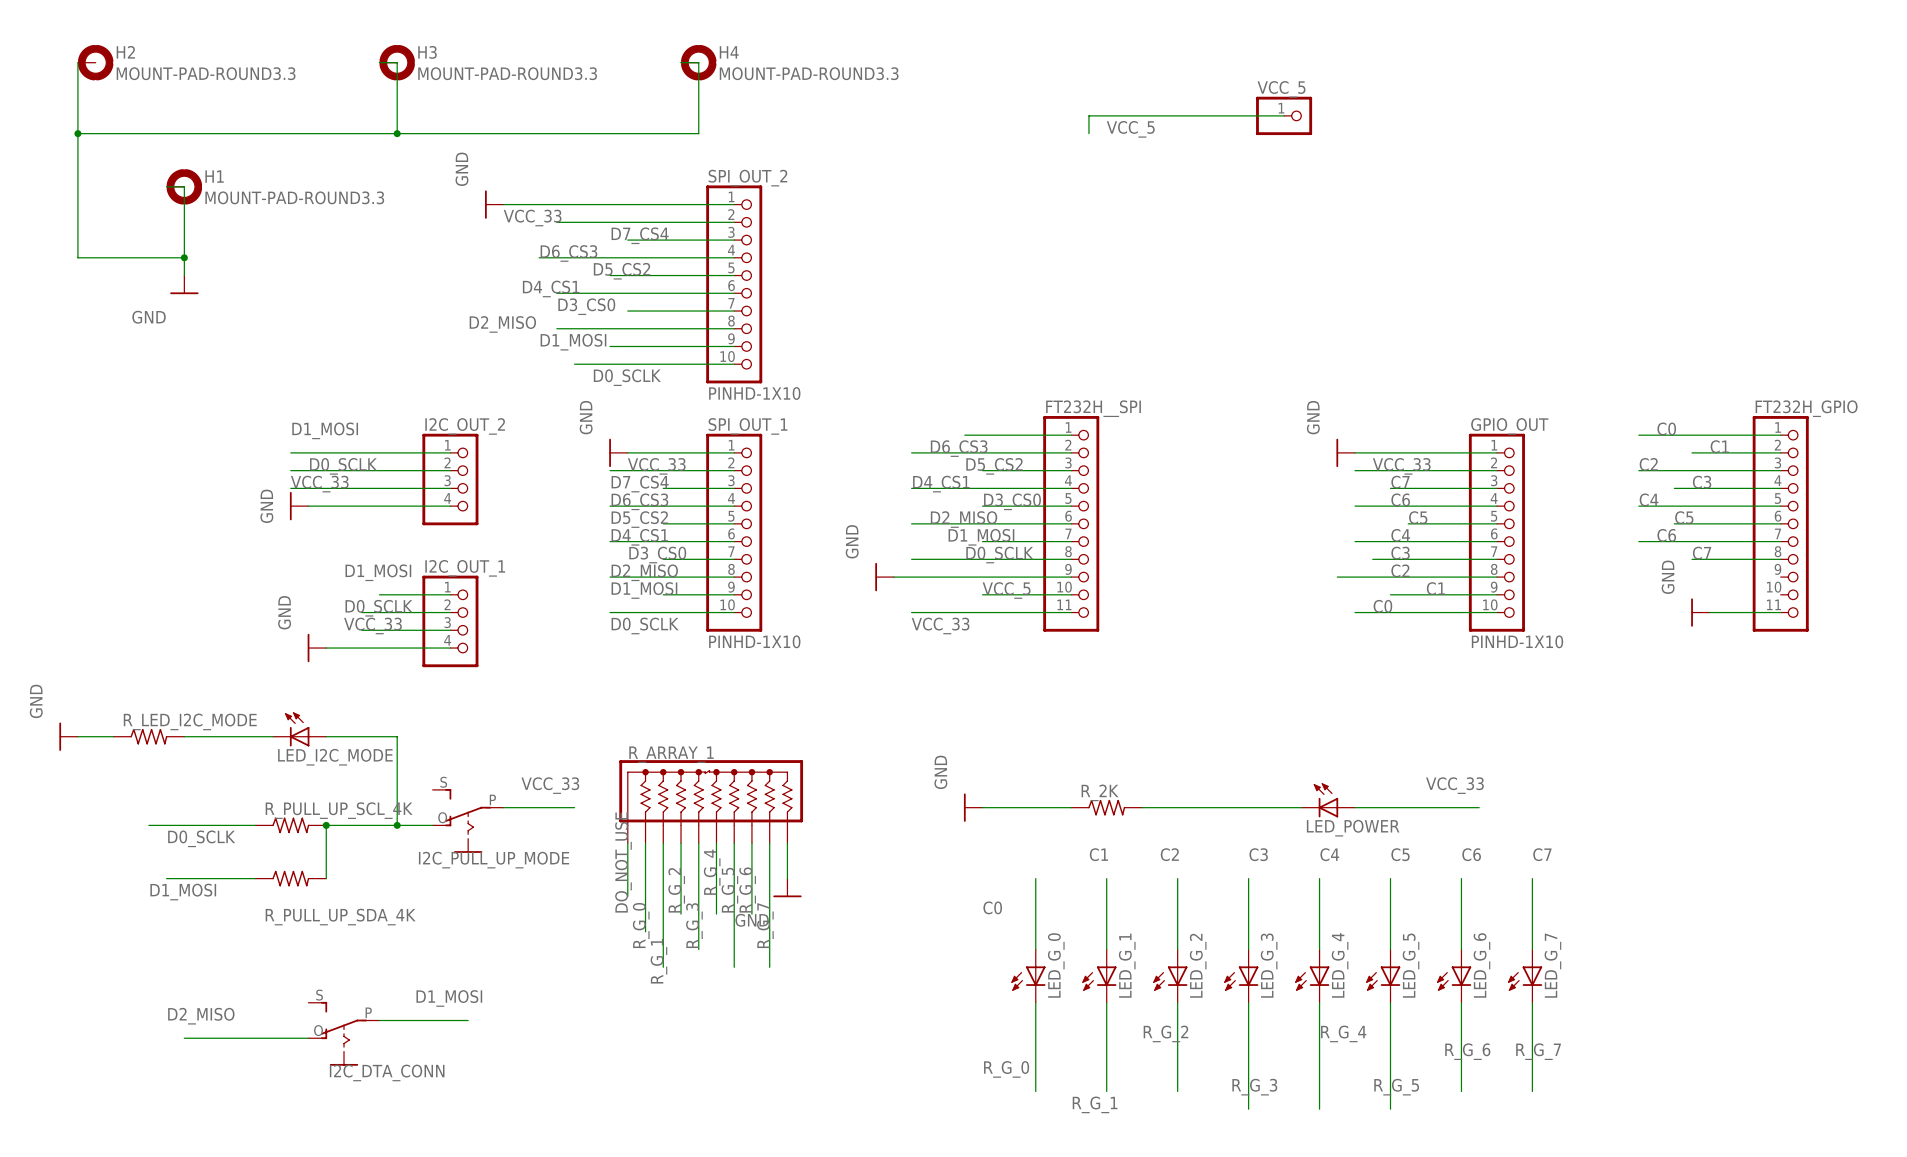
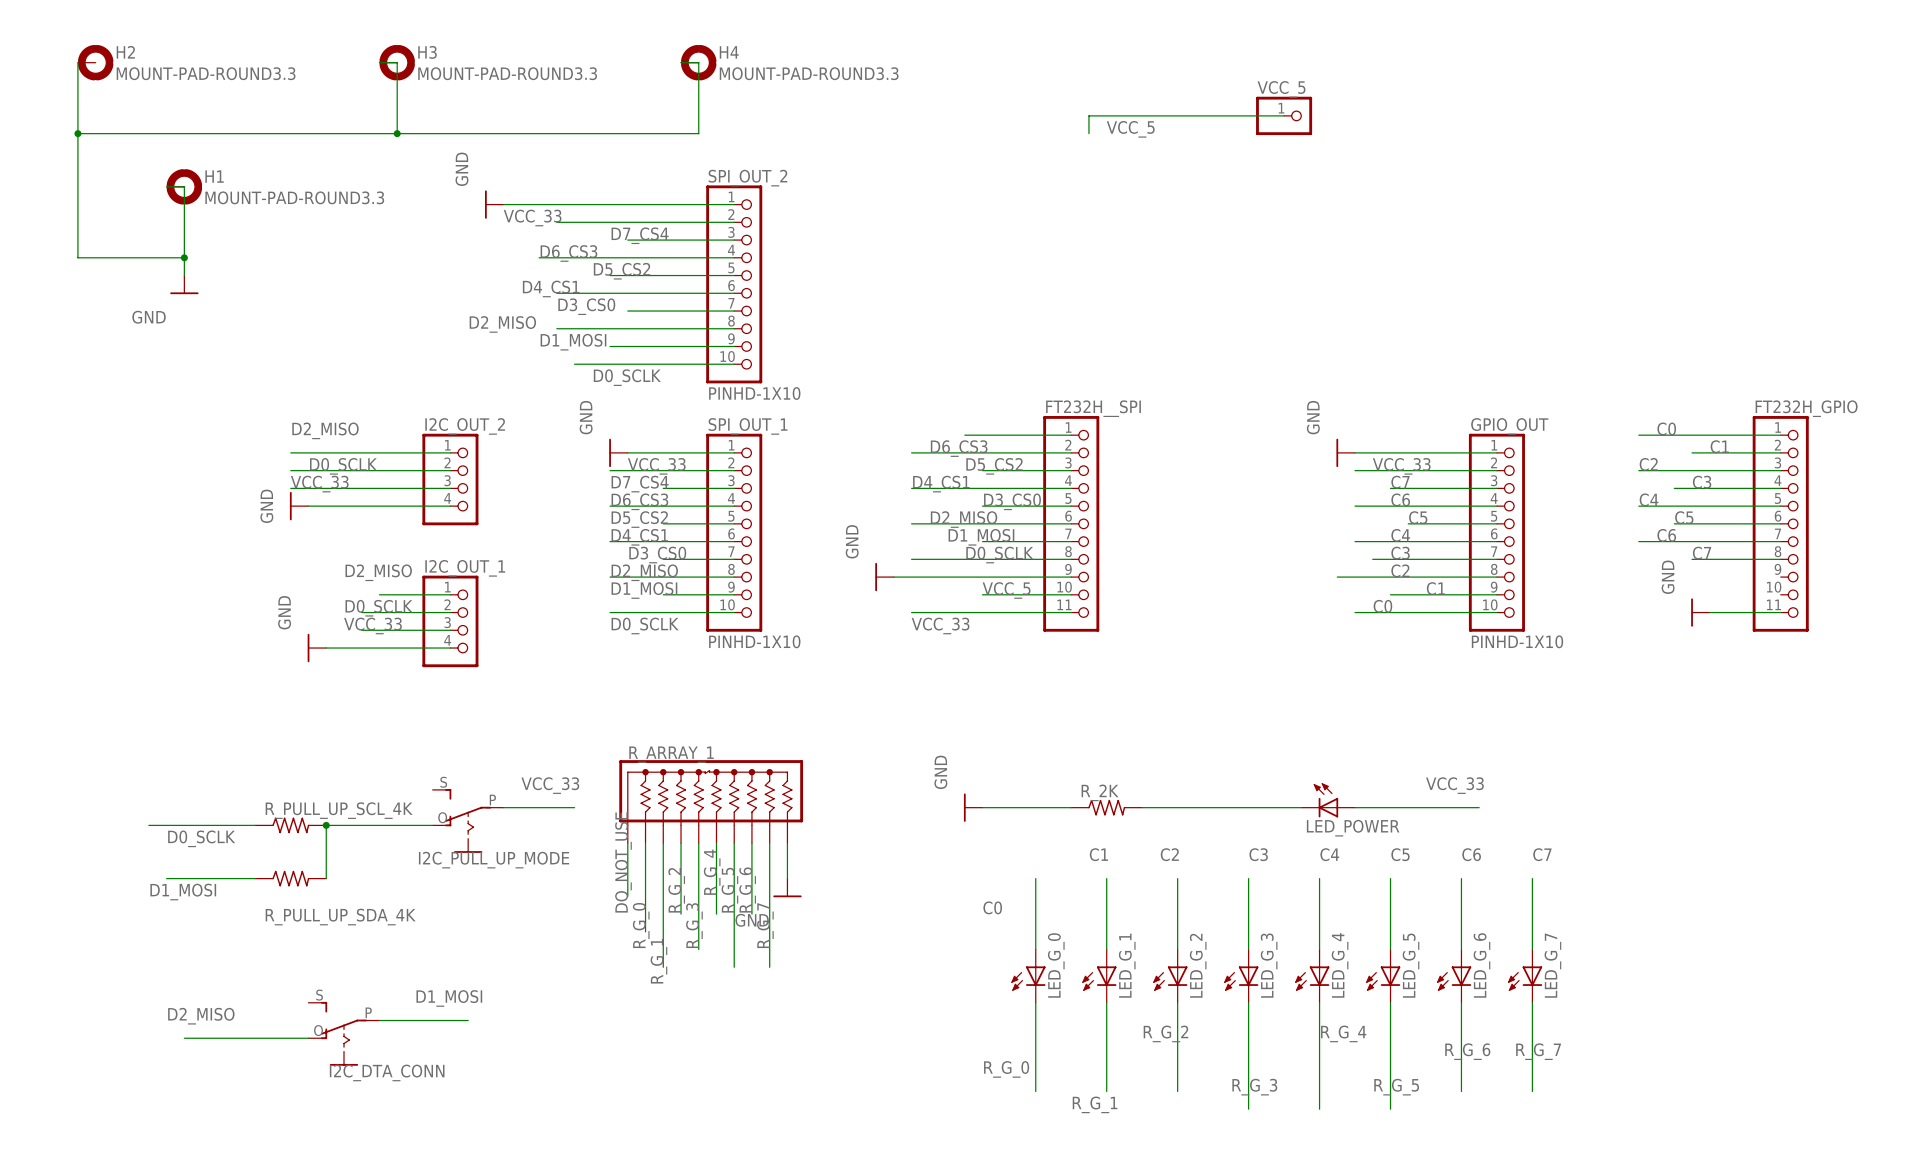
label: D1_MOSI (325, 430) -> D2_MISO (325, 430)
label: D1_MOSI (378, 572) -> D2_MISO (378, 572)
LED_I2C_MODE: (299, 729) -> none
power symbol: GND (68, 736) -> none
wire: (77, 736) (113, 736) -> none
R_LED_I2C_MODE: (148, 736) -> none
wire: (184, 736) (273, 736) -> none
wire: (326, 736) (397, 736) (397, 825) -> none
junction: (397, 825) -> none

